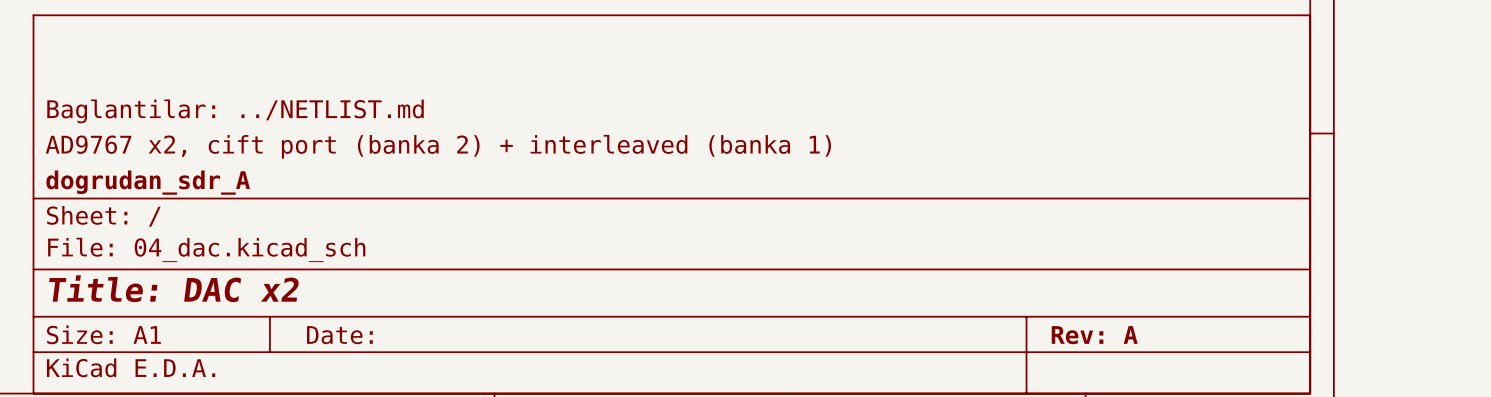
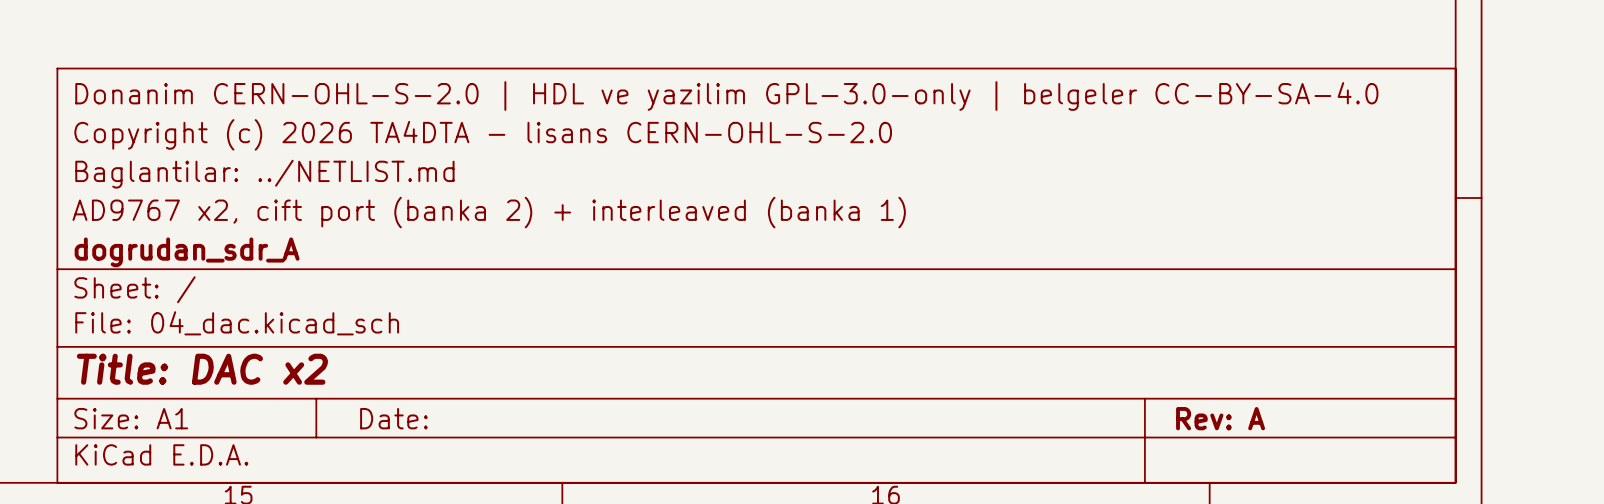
title block: none -> Donanim CERN-OHL-S-2.0 | HDL ve yazilim GPL-3.0-only | belgeler CC-BY-SA-4.0 (726, 96)
title block: none -> Copyright (c) 2026 TA4DTA - lisans CERN-OHL-S-2.0 (483, 134)

